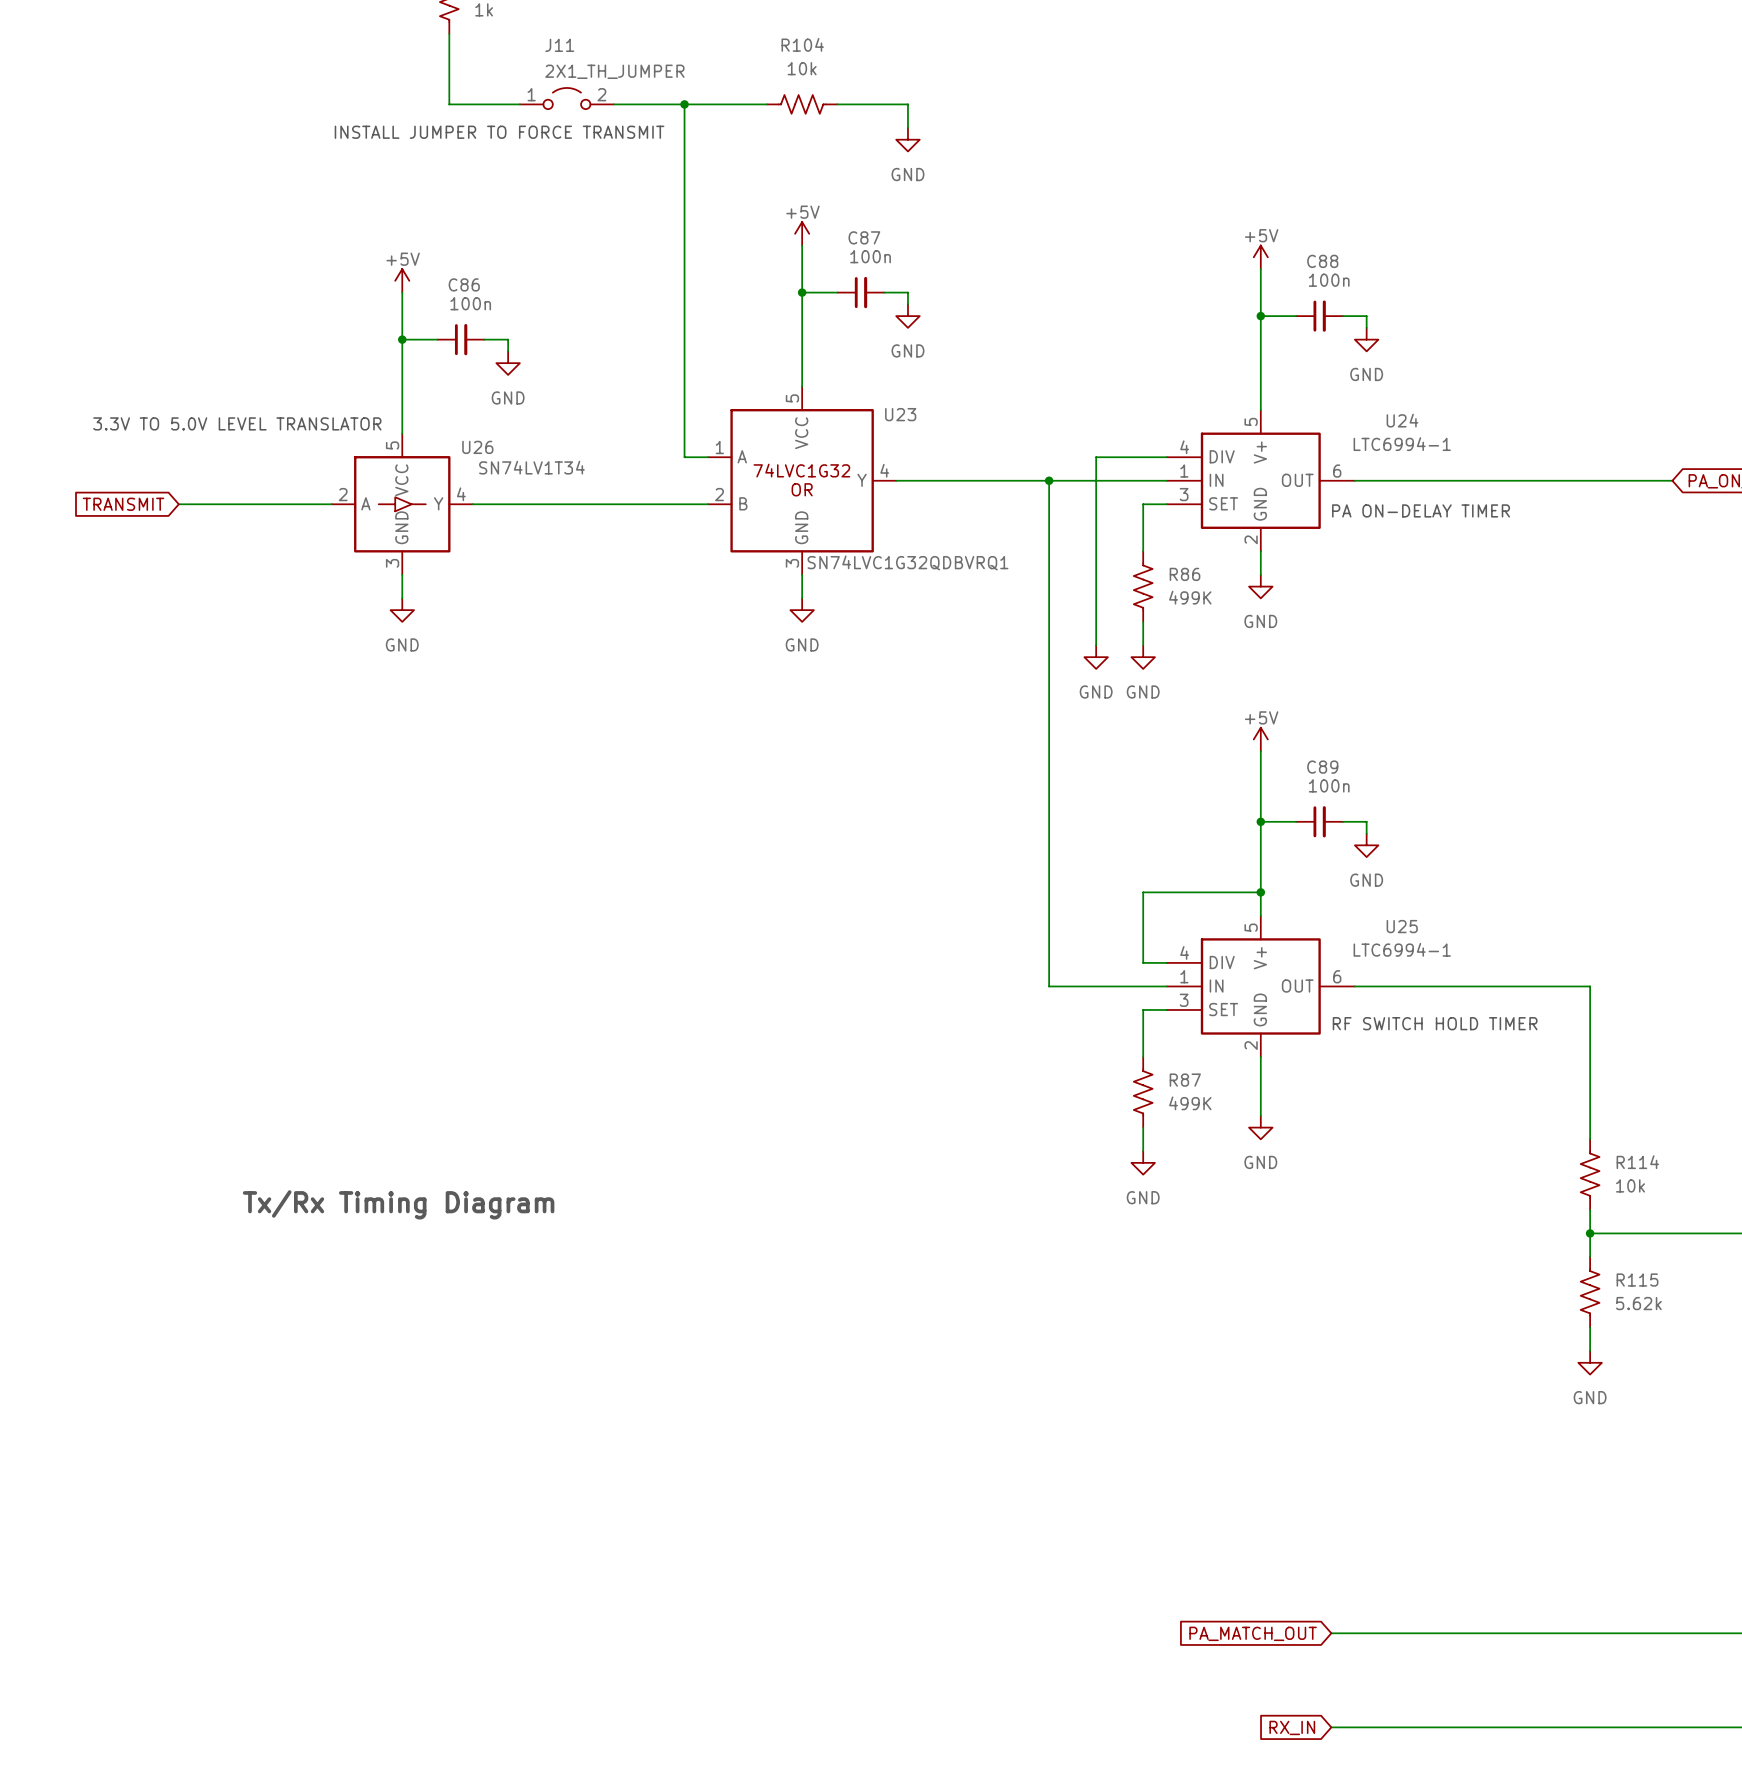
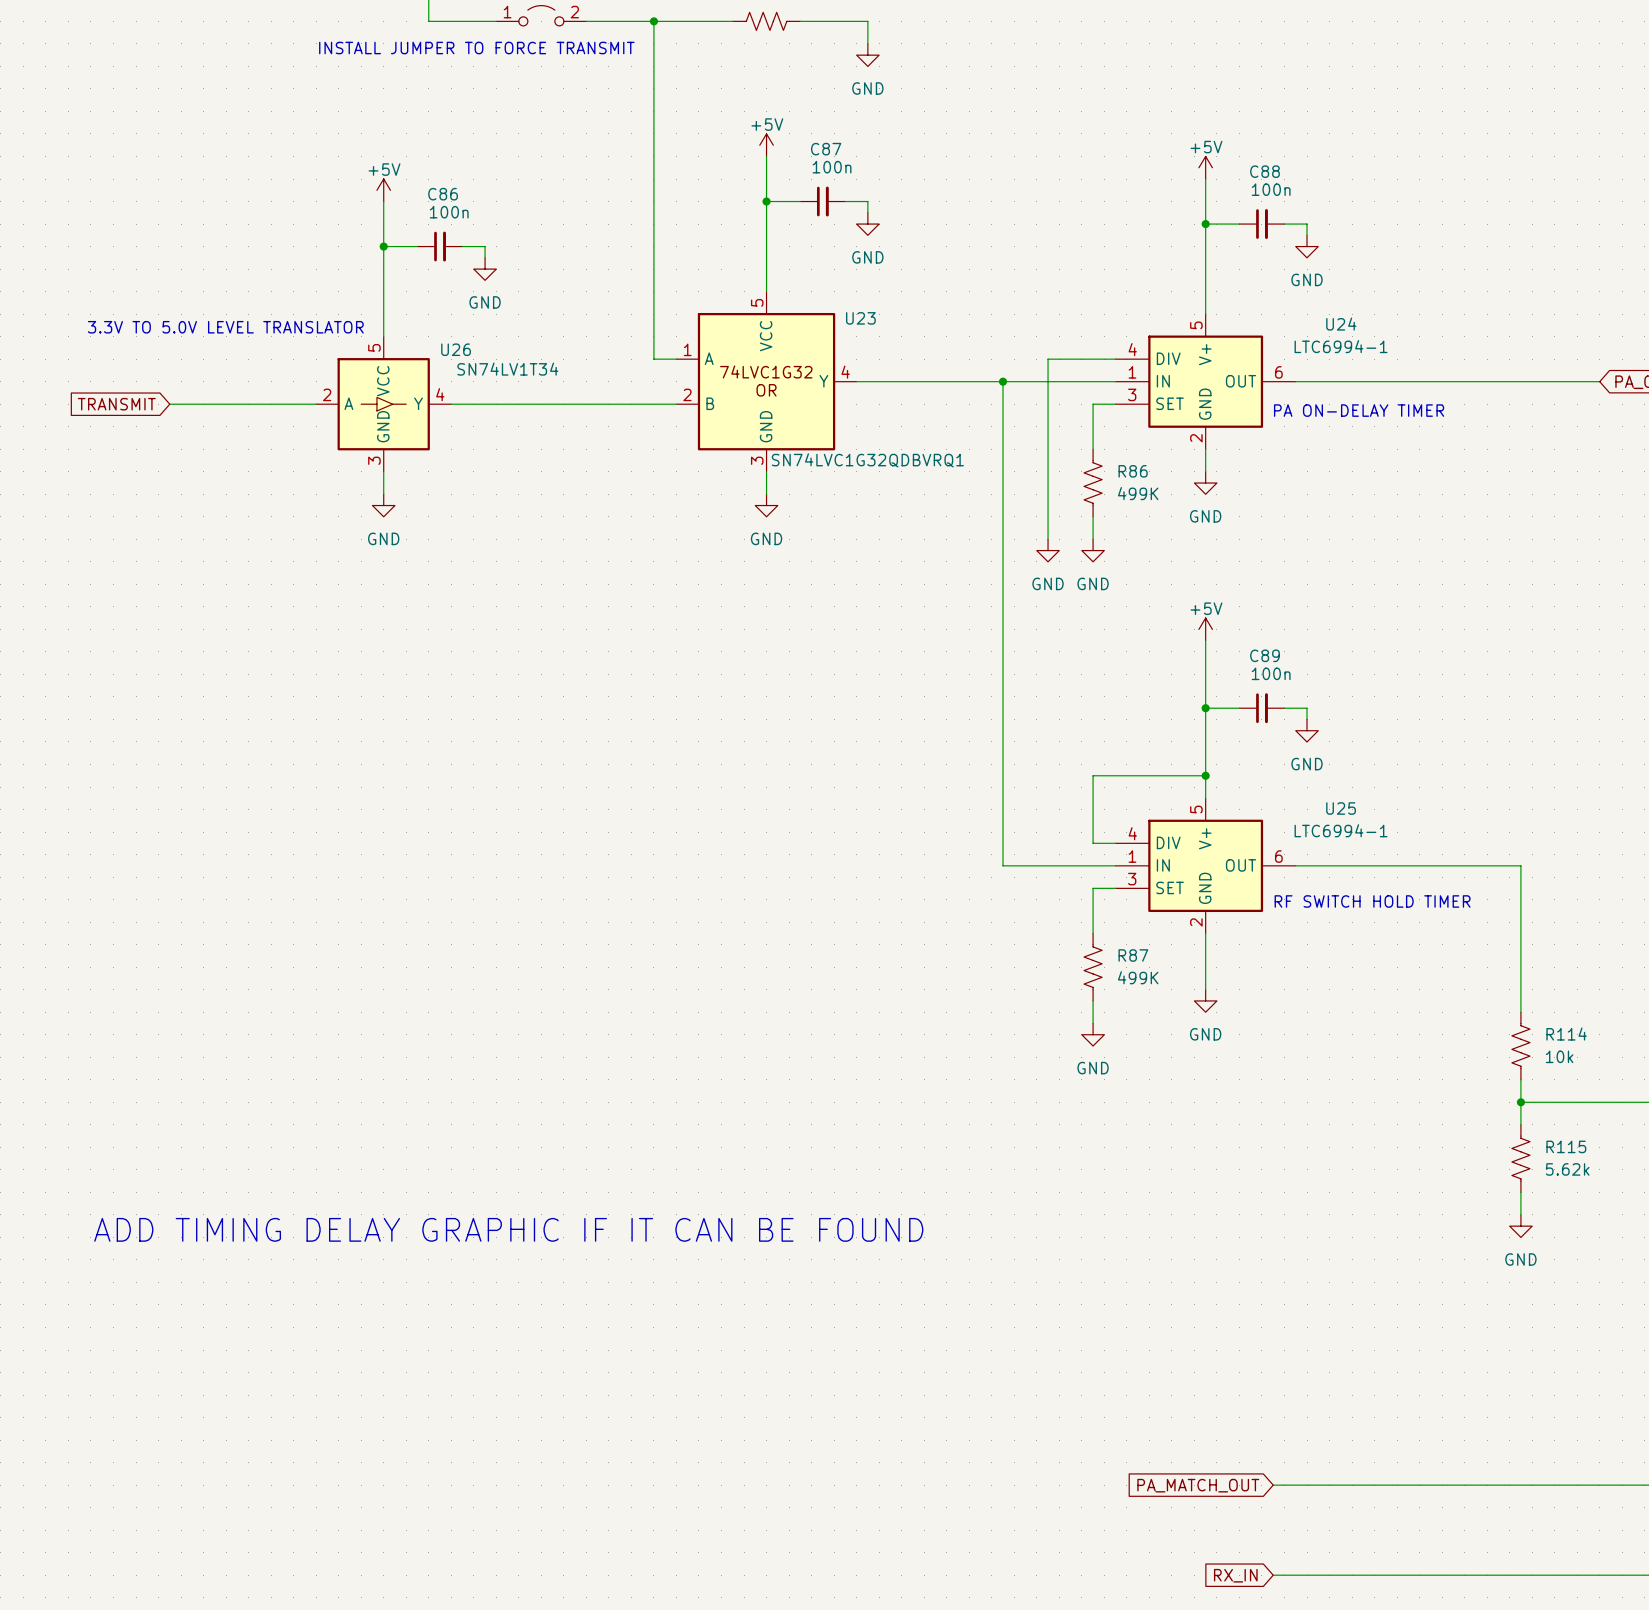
text: Tx/Rx Timing Diagram (398, 1204) -> none
text: none -> ADD TIMING DELAY GRAPHIC IF IT CAN BE FOUND (508, 1229)

